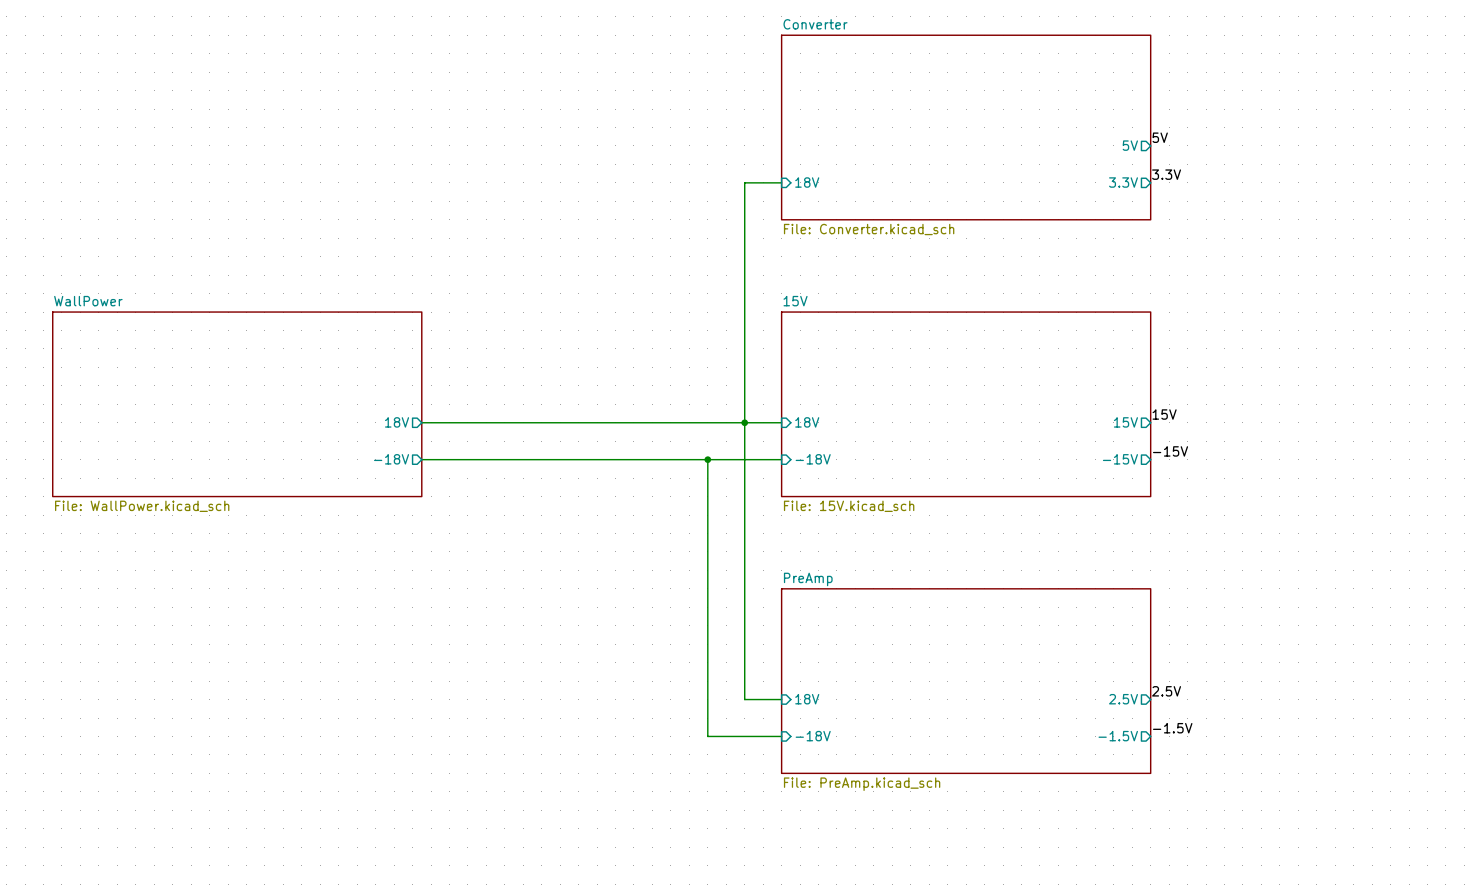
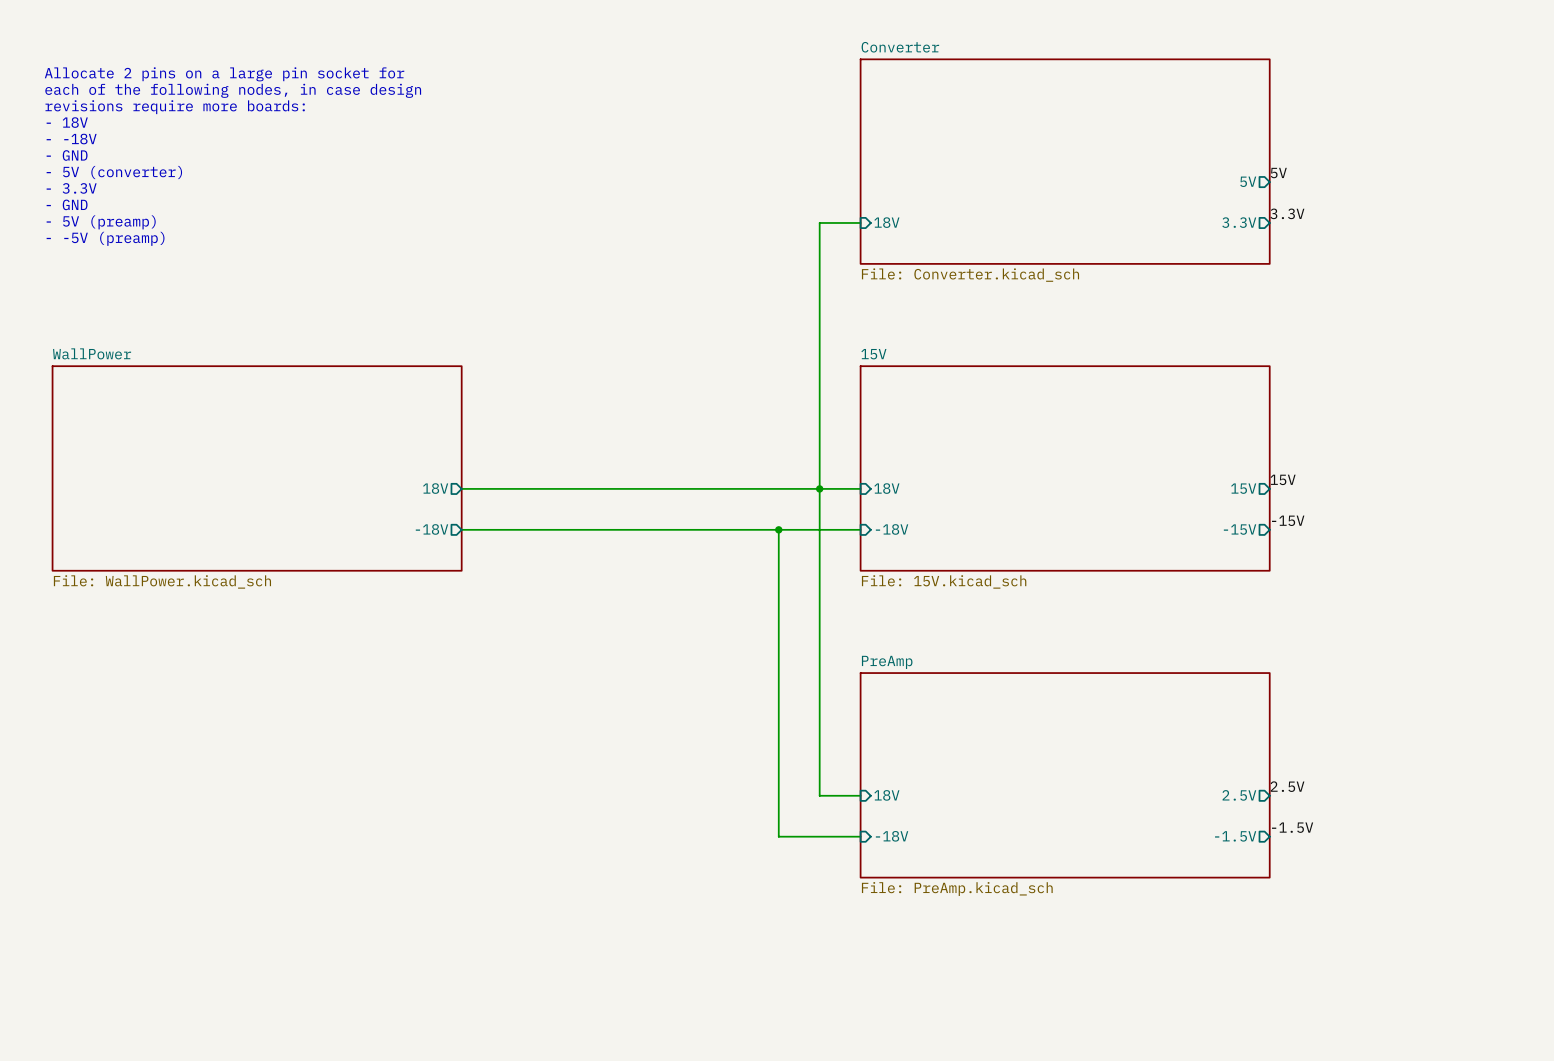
text: none -> Allocate 2 pins on a large pin socket for (224, 74)
text: none -> each of the following nodes, in case design (233, 90)
text: none -> revisions require more boards: (175, 107)
text: none -> - 18V (67, 122)
text: none -> - -18V (71, 139)
text: none -> - GND (67, 155)
text: none -> - 5V (converter) (114, 172)
text: none -> - 3.3V (71, 188)
text: none -> - GND (67, 204)
text: none -> - 5V (preamp) (101, 222)
text: none -> - -5V (preamp) (105, 238)

